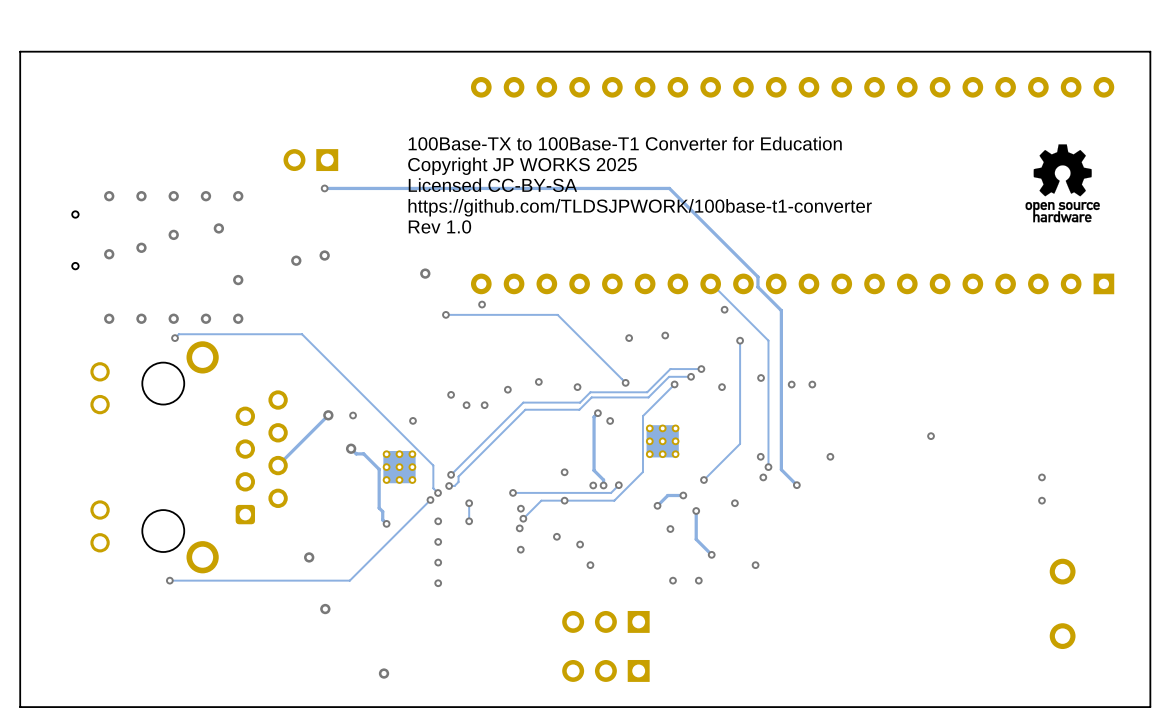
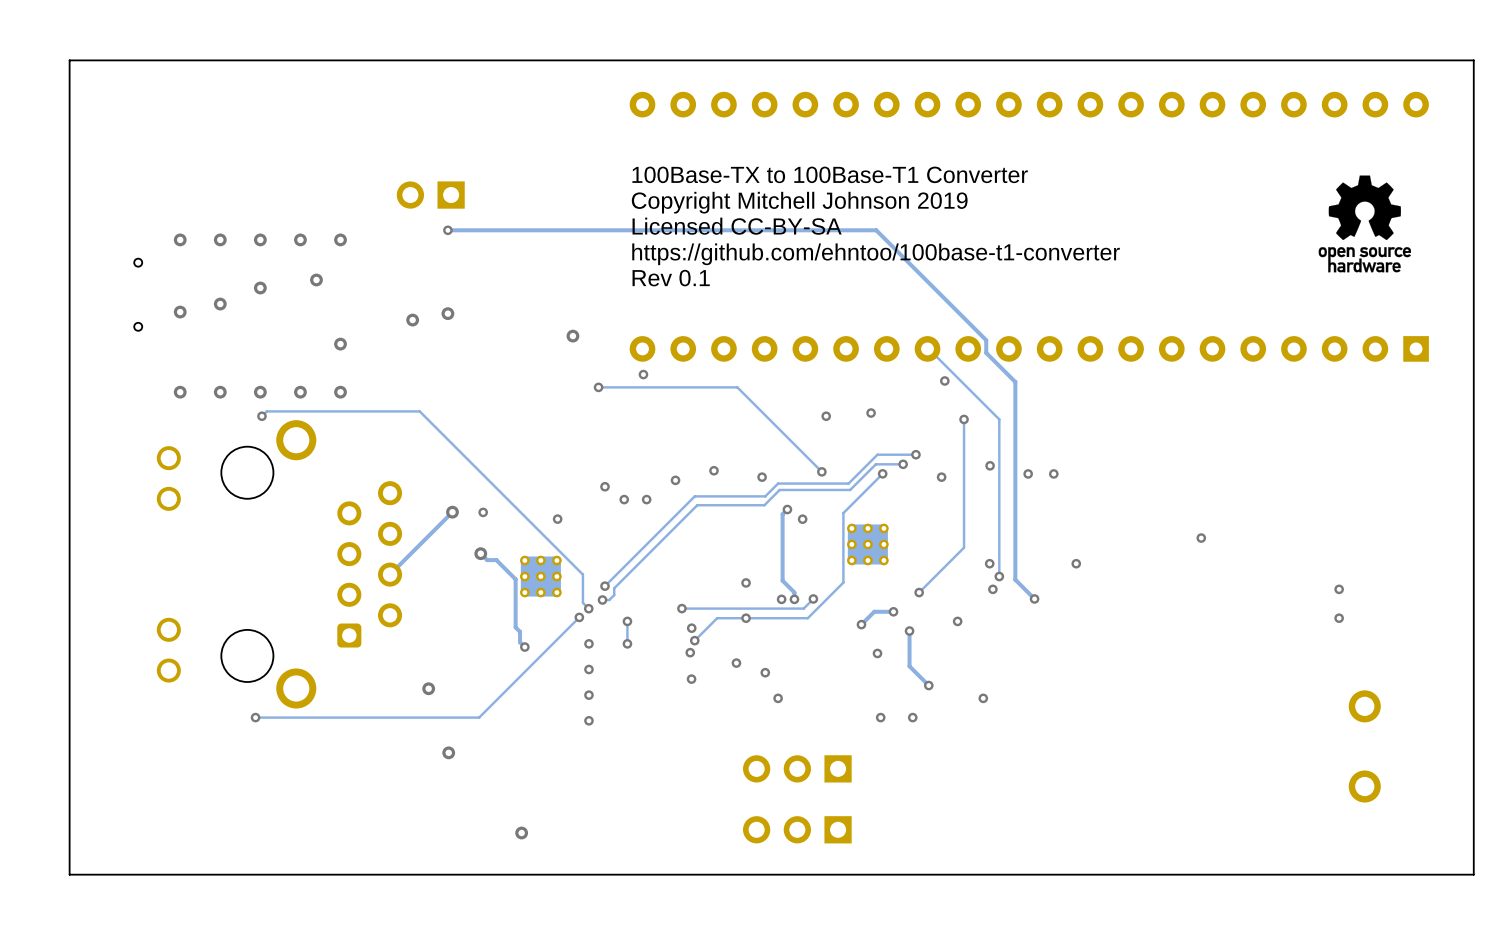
text: 100Base-TX to 100Base-T1 Converter for Education (625, 143) -> 100Base-TX to 100Base-T1 Converter (830, 174)
text: Copyright JP WORKS 2025 (522, 166) -> none
text: none -> Copyright Mitchell Johnson 2019 (799, 202)
text position: Licensed CC-BY-SA (492, 185) -> Licensed CC-BY-SA (737, 226)
text: https://github.com/TLDSJPWORK/100base-t1-converter (640, 207) -> https://github.com/ehntoo/100base-t1-converter (876, 254)
text: Rev 1.0 (439, 226) -> Rev 0.1 (671, 278)

